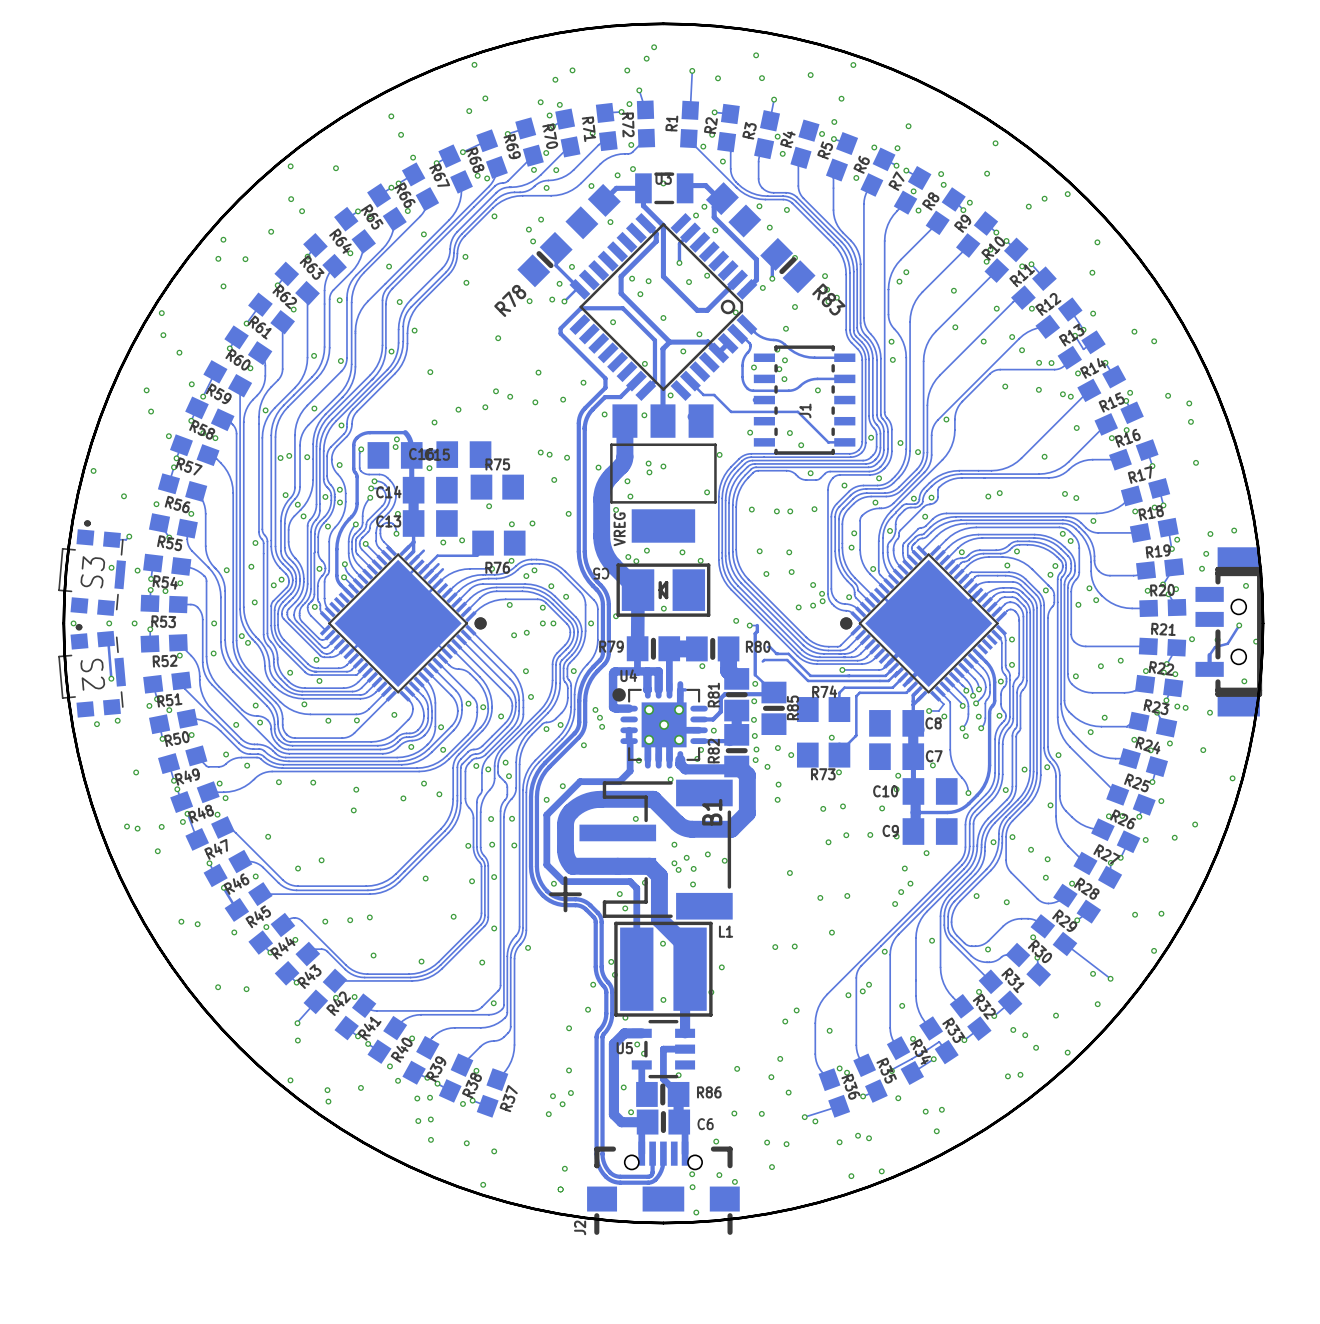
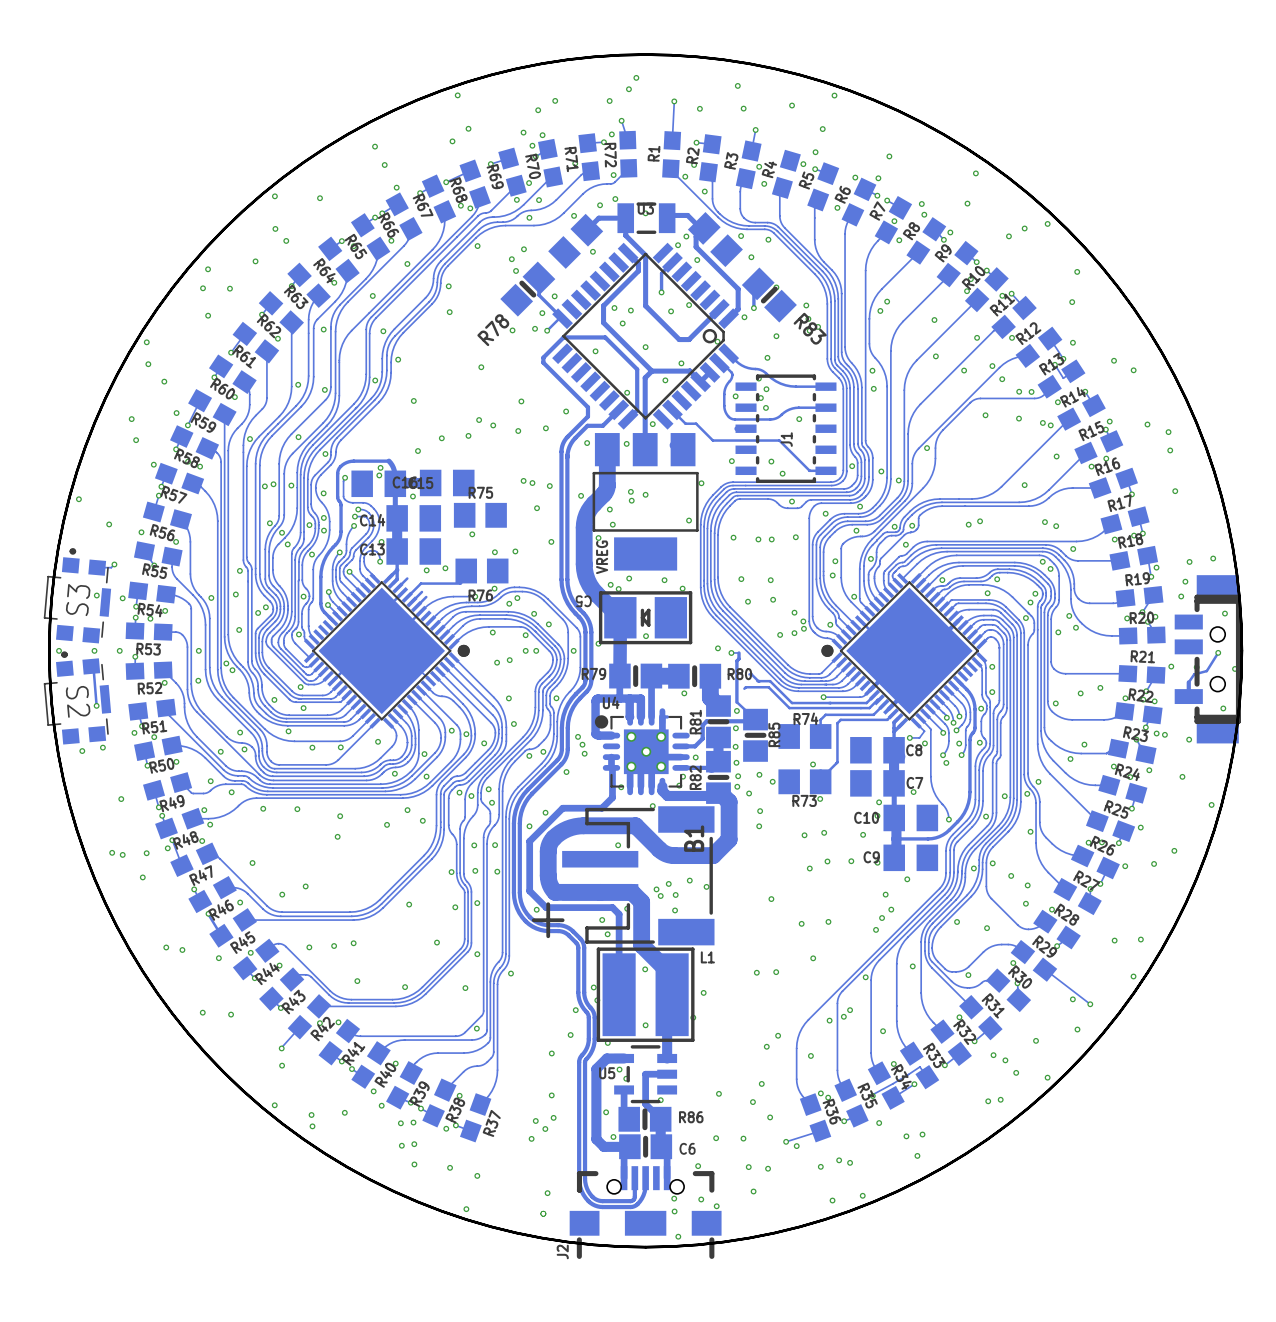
via: (674, 844) -> none

